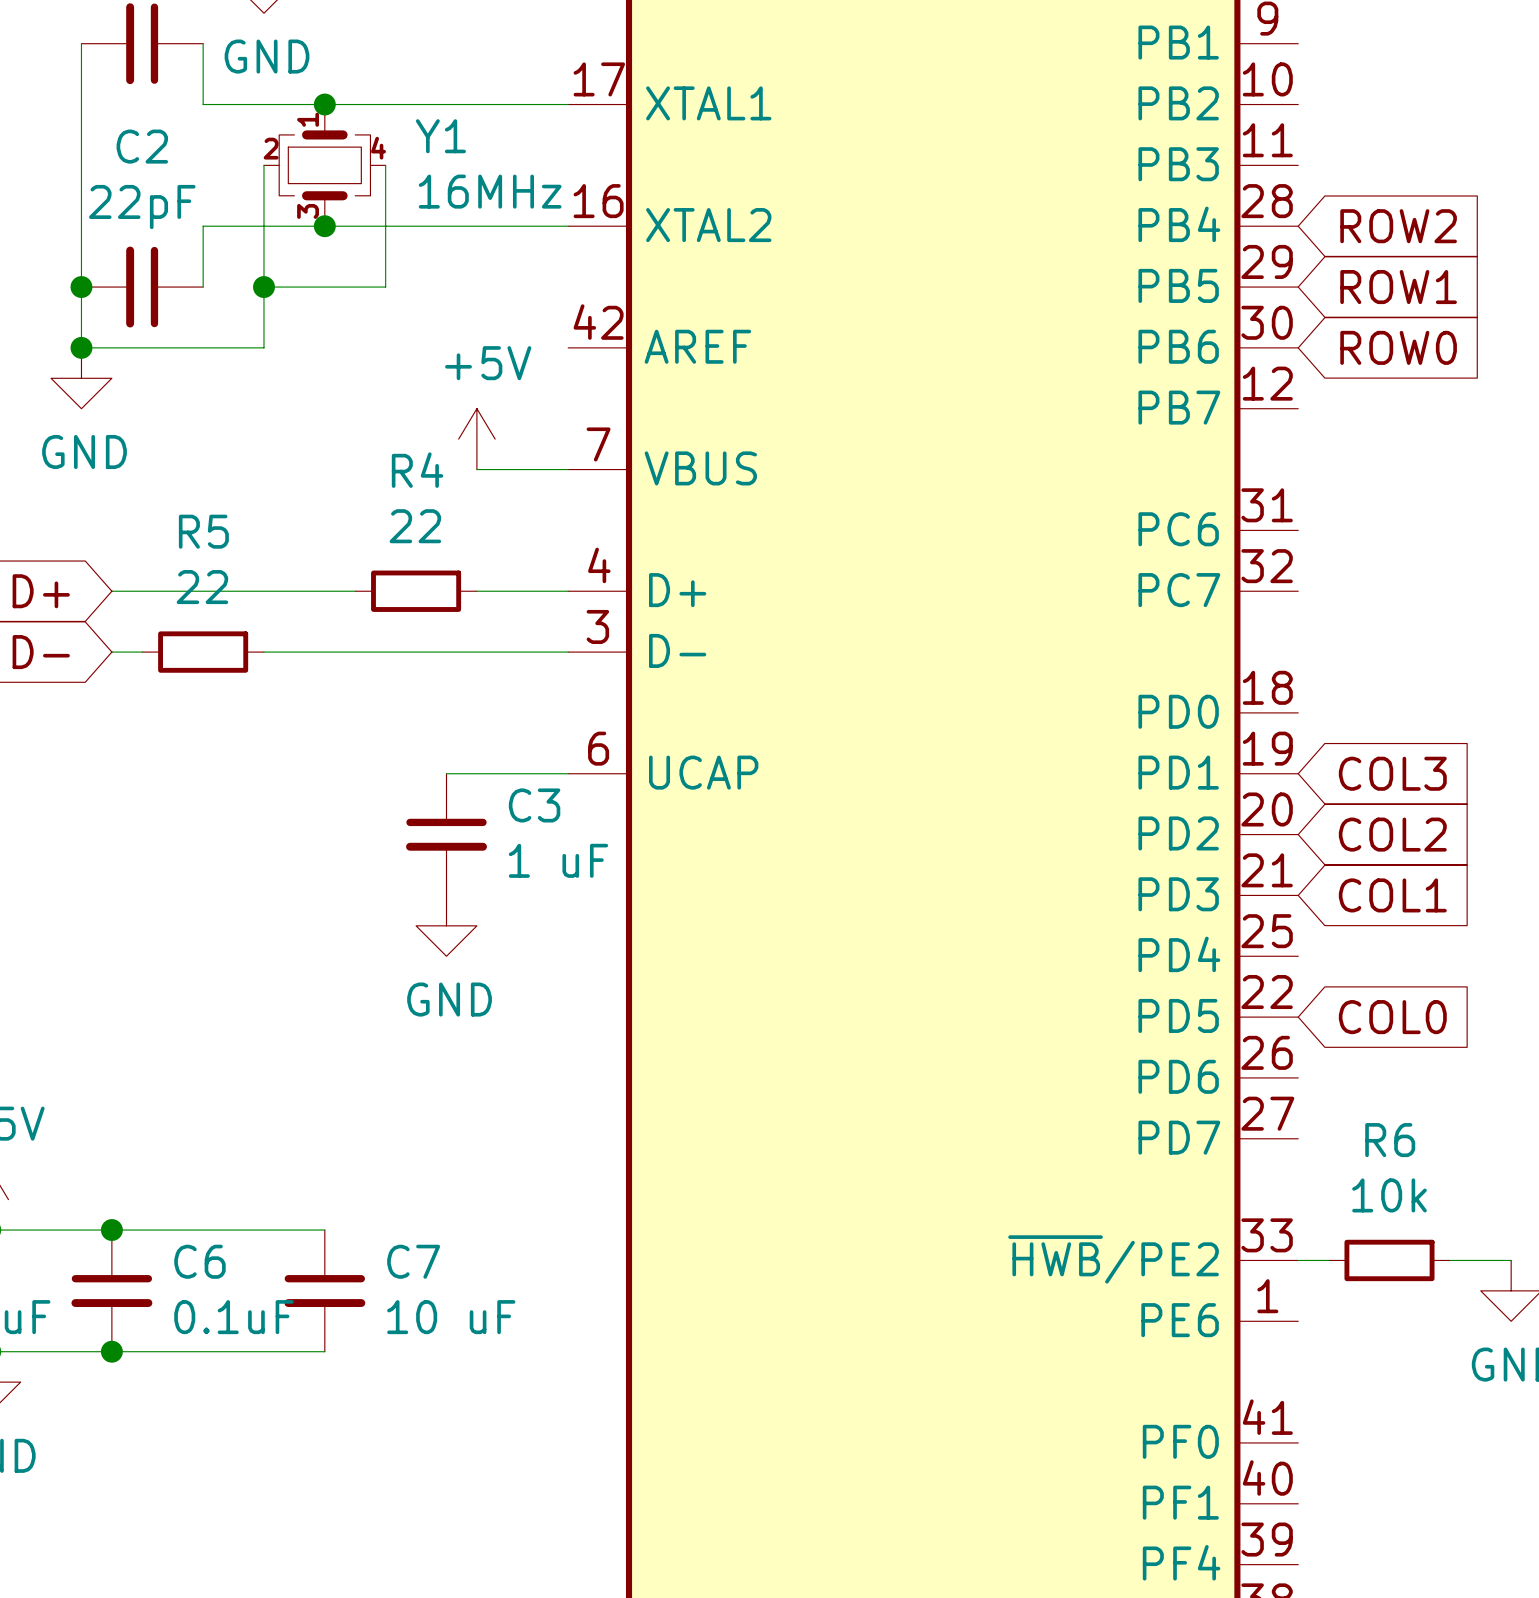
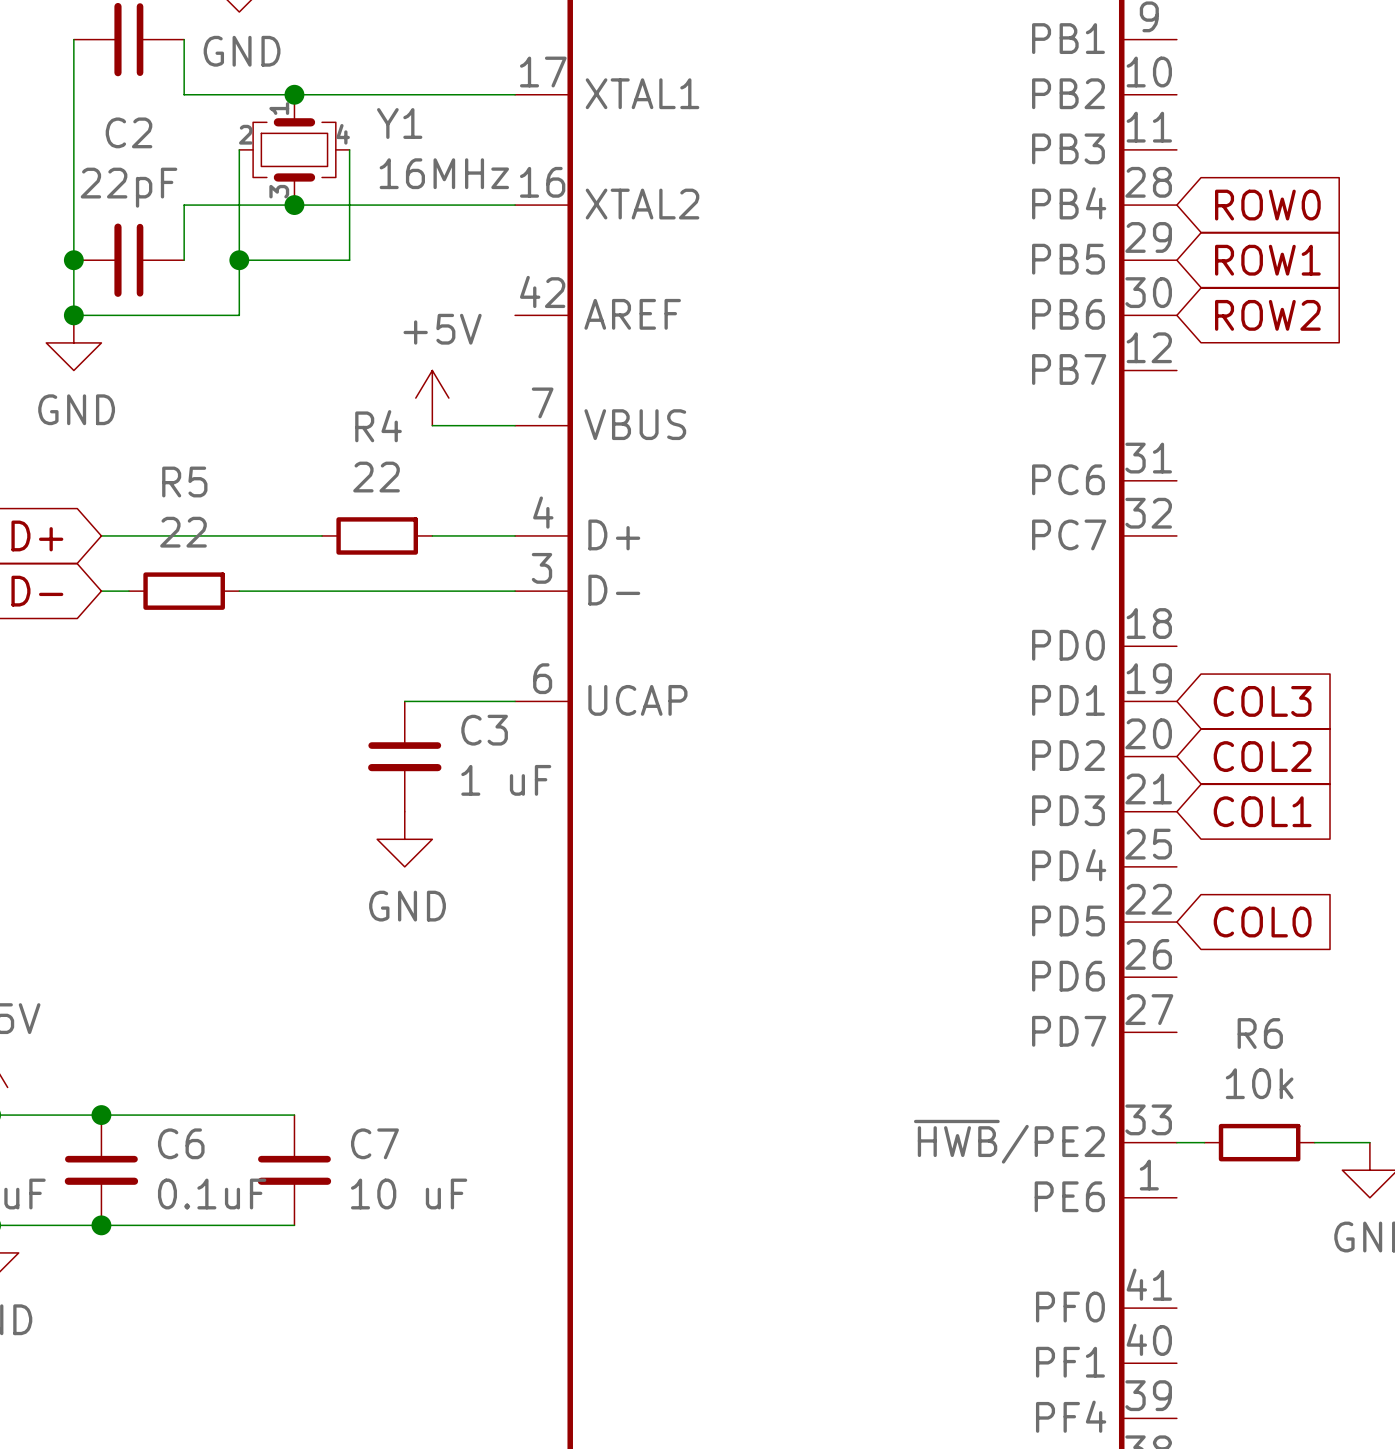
global label: ROW2 (1398, 226) -> ROW0 (1267, 205)
global label: ROW0 (1398, 347) -> ROW2 (1267, 315)

